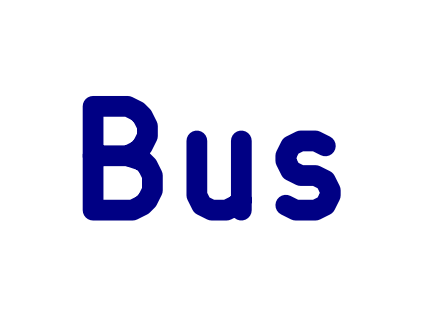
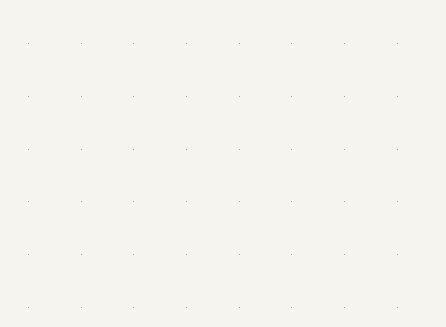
text: Bus (211, 158) -> none

